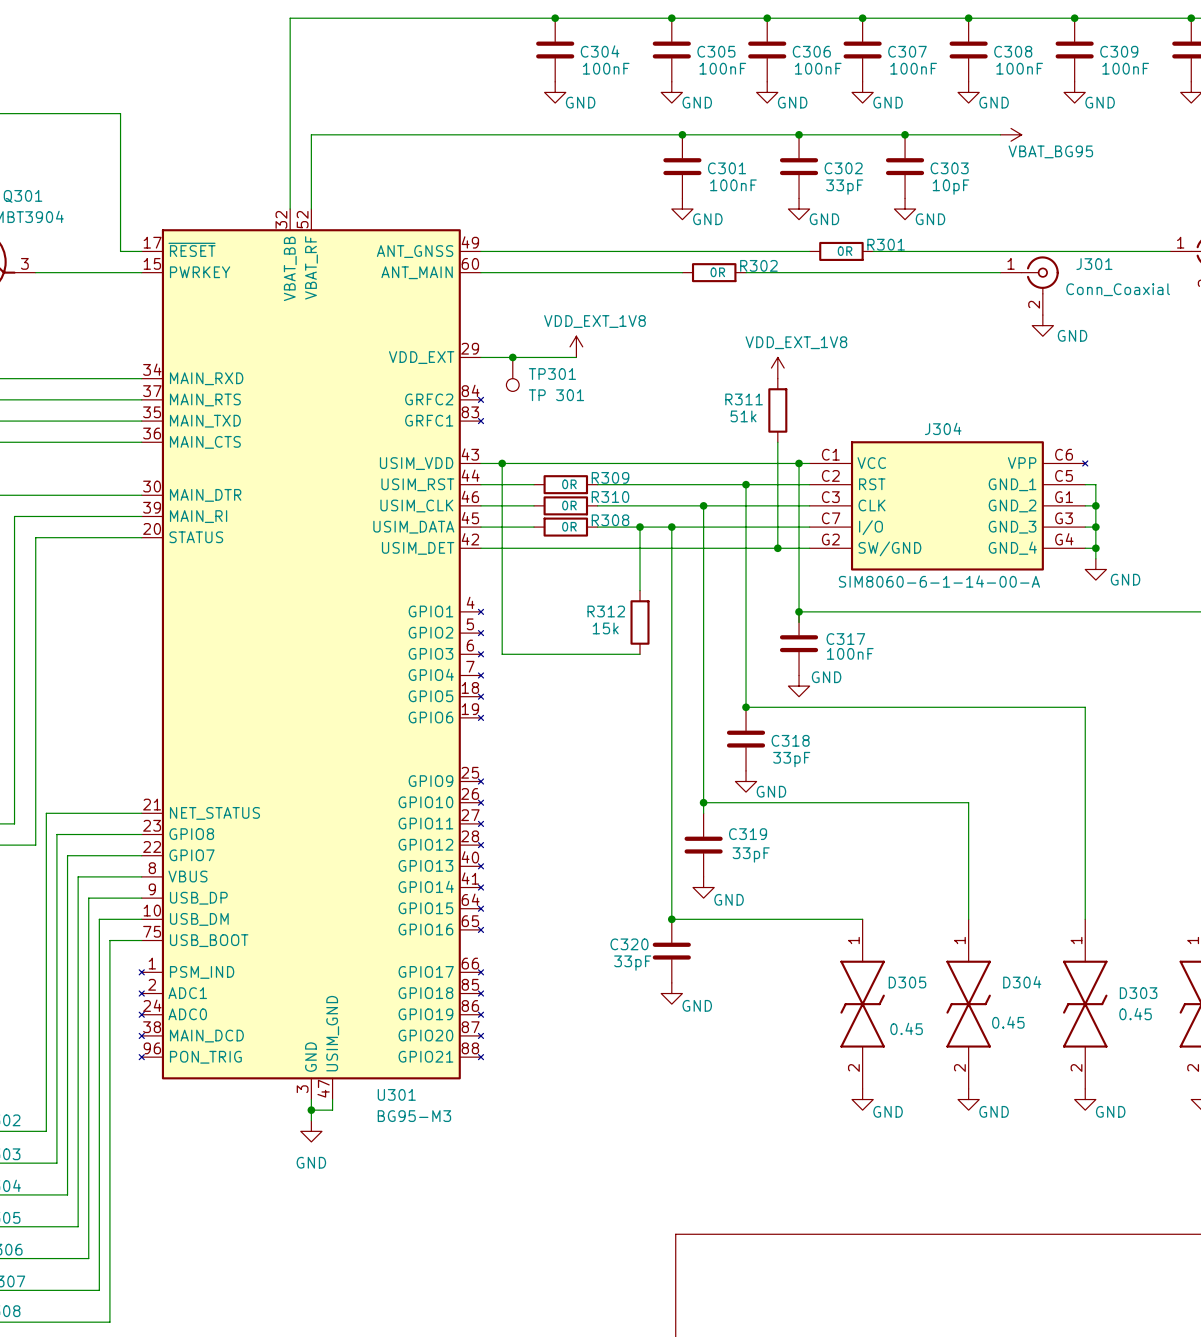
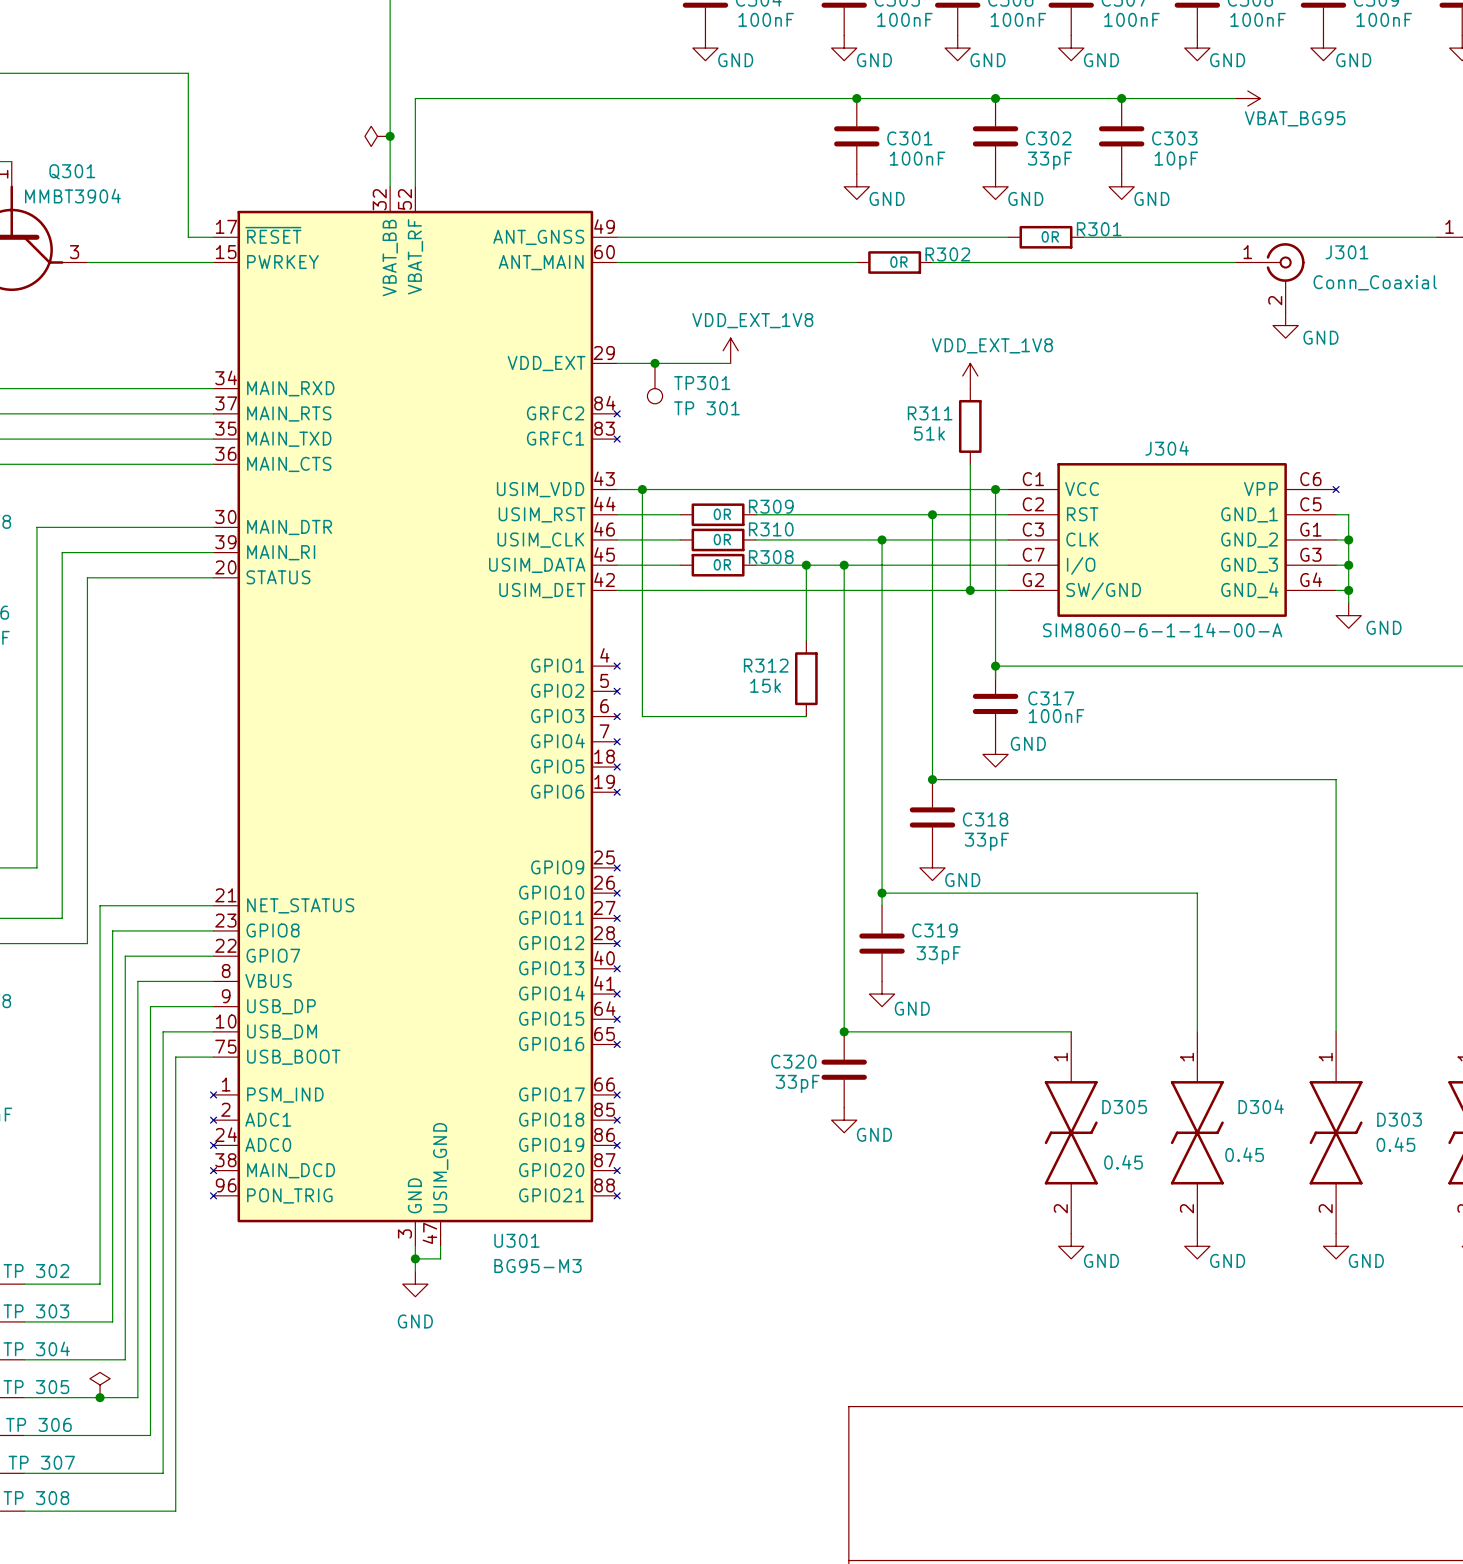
power symbol: none -> (377, 136)
junction: none -> (390, 136)
power symbol: none -> (100, 1385)
junction: none -> (100, 1397)

